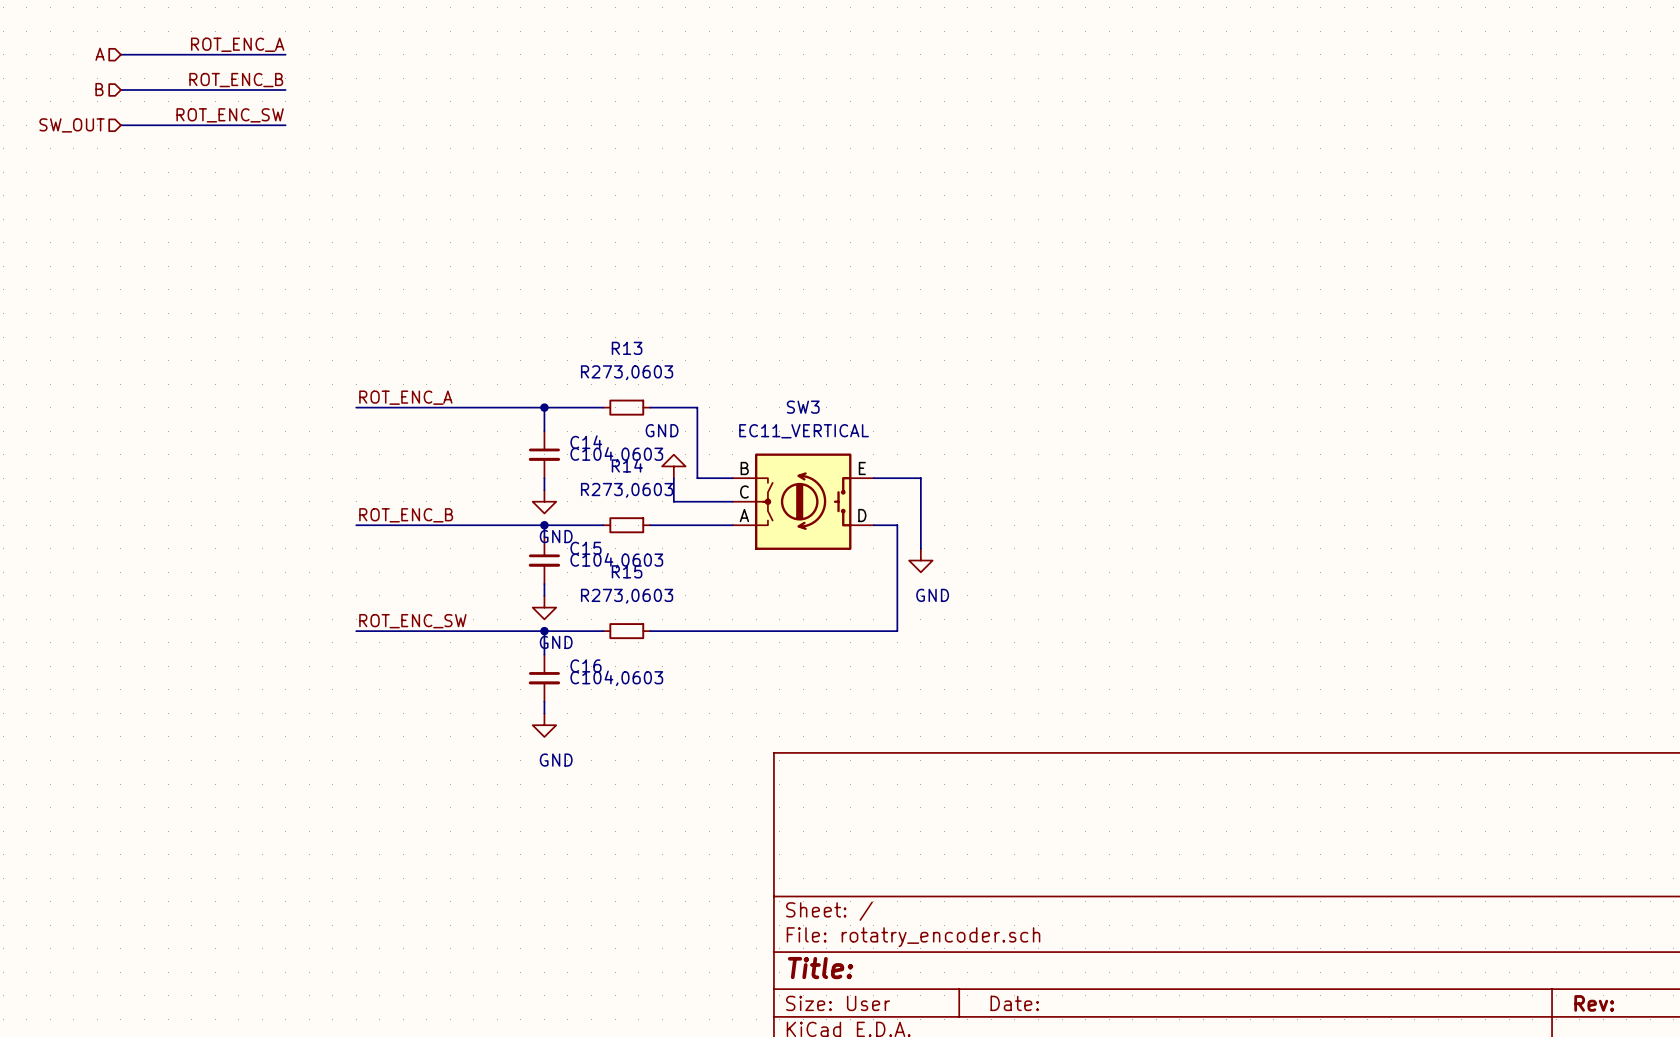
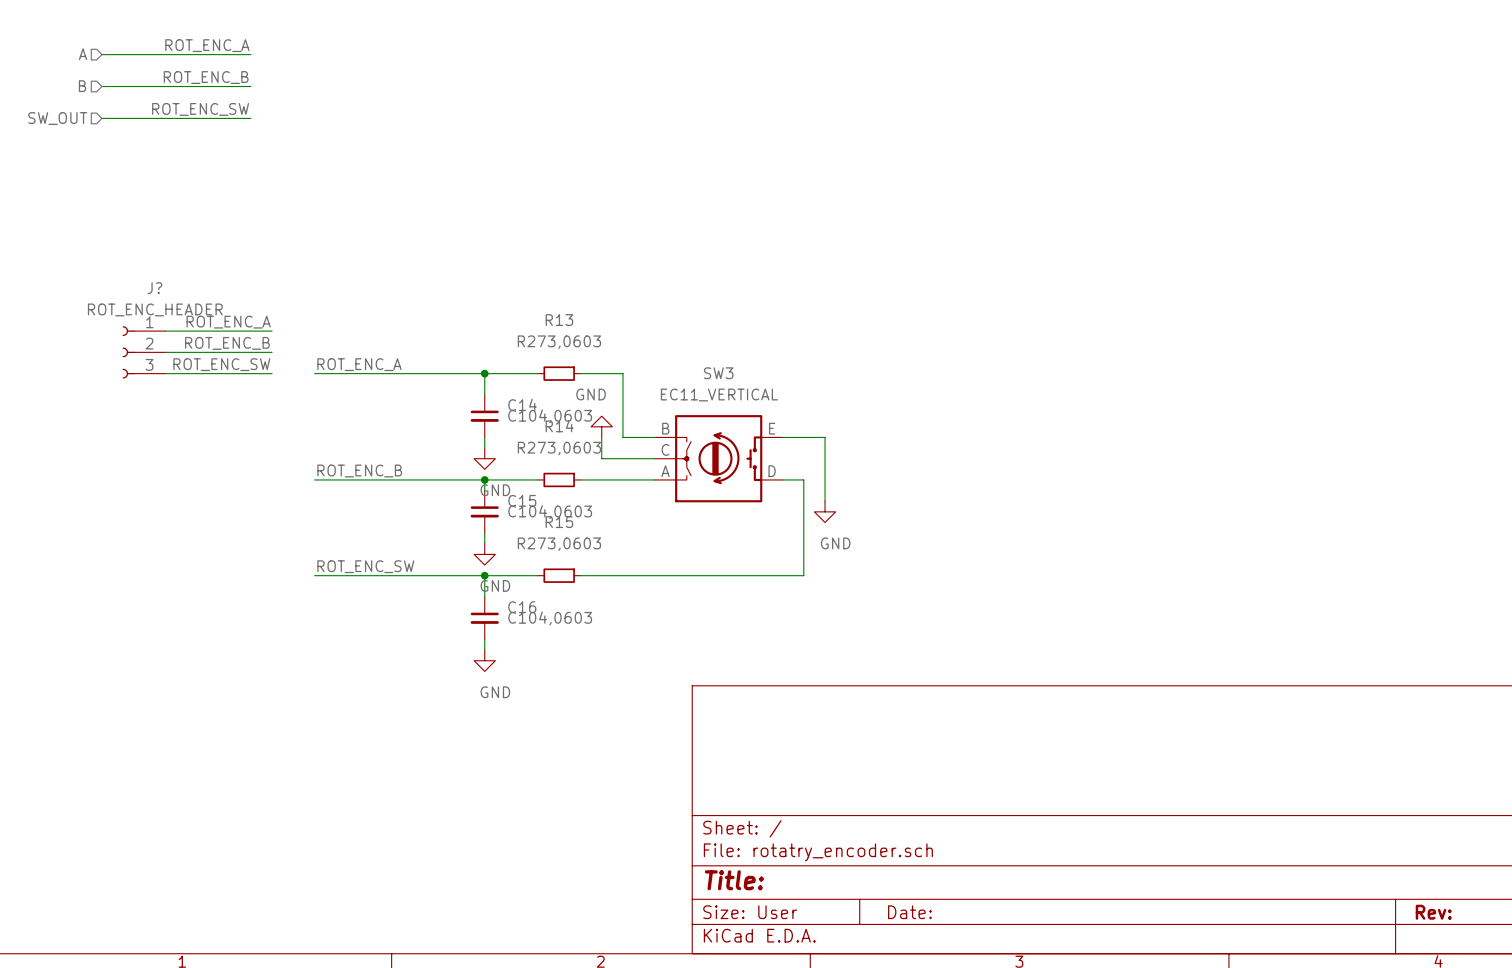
label: none -> ROT_ENC_A (228, 322)
wire: none -> (165, 331) (272, 331)
label: none -> ROT_ENC_B (227, 343)
J?: none -> ROT_ENC_HEADER (144, 352)
wire: none -> (165, 352) (272, 352)
label: none -> ROT_ENC_SW (221, 364)
wire: none -> (165, 373) (272, 373)

